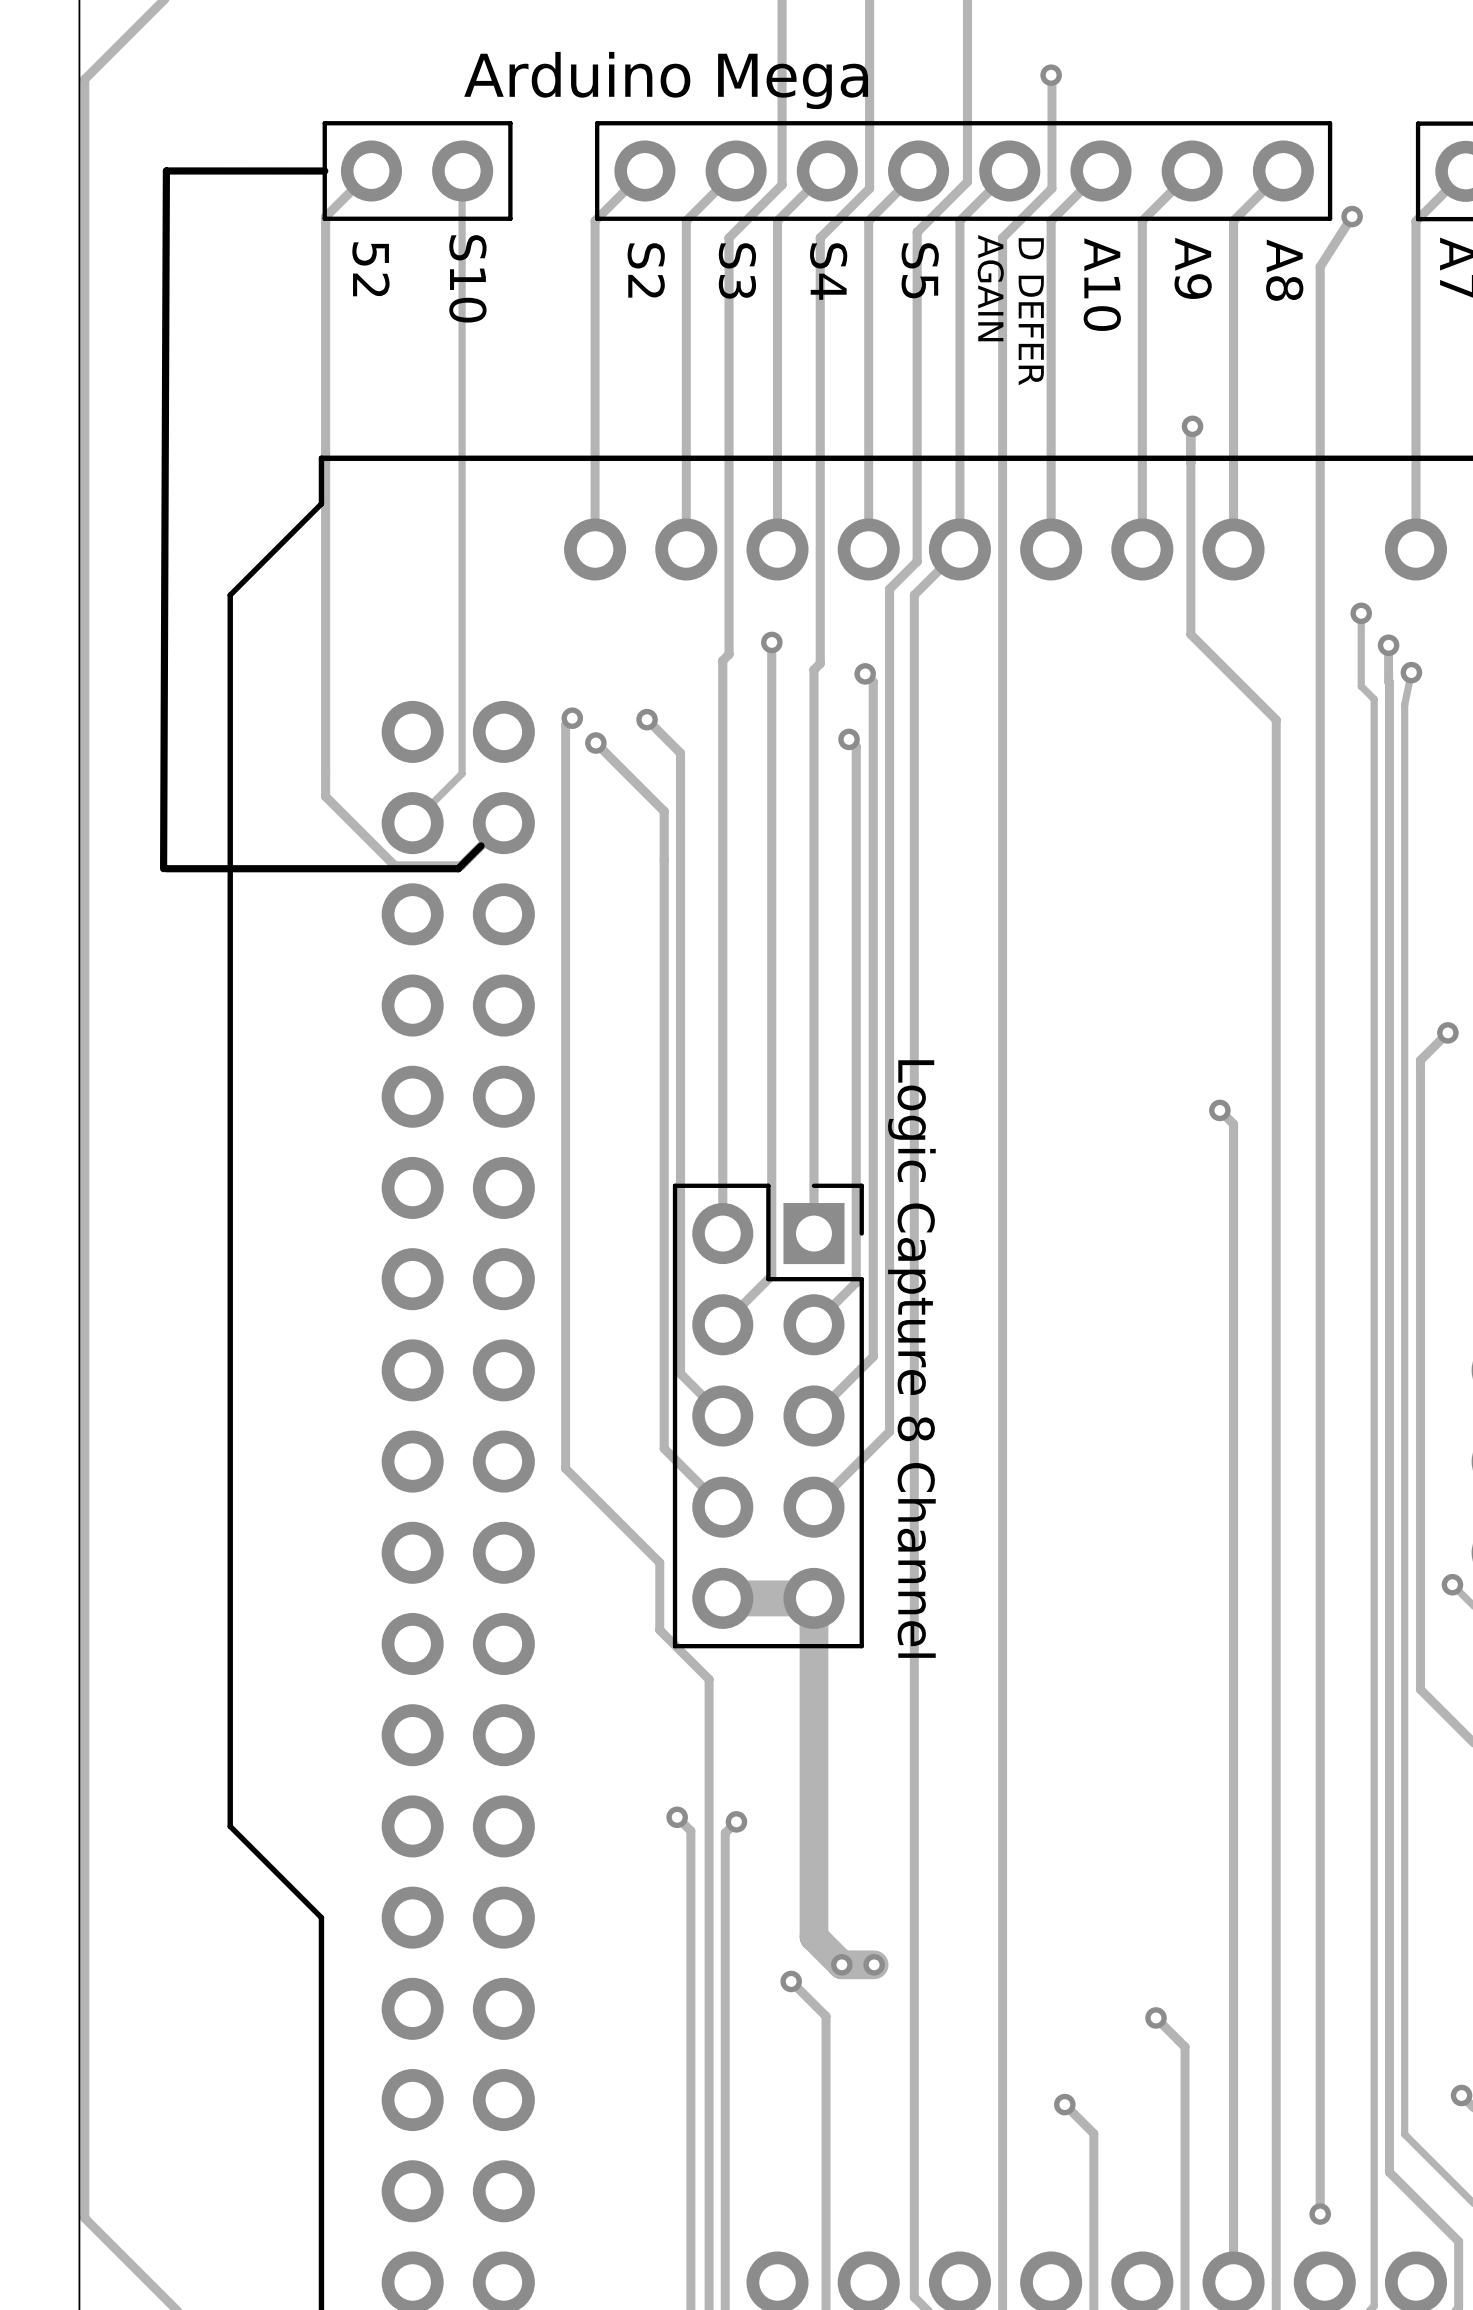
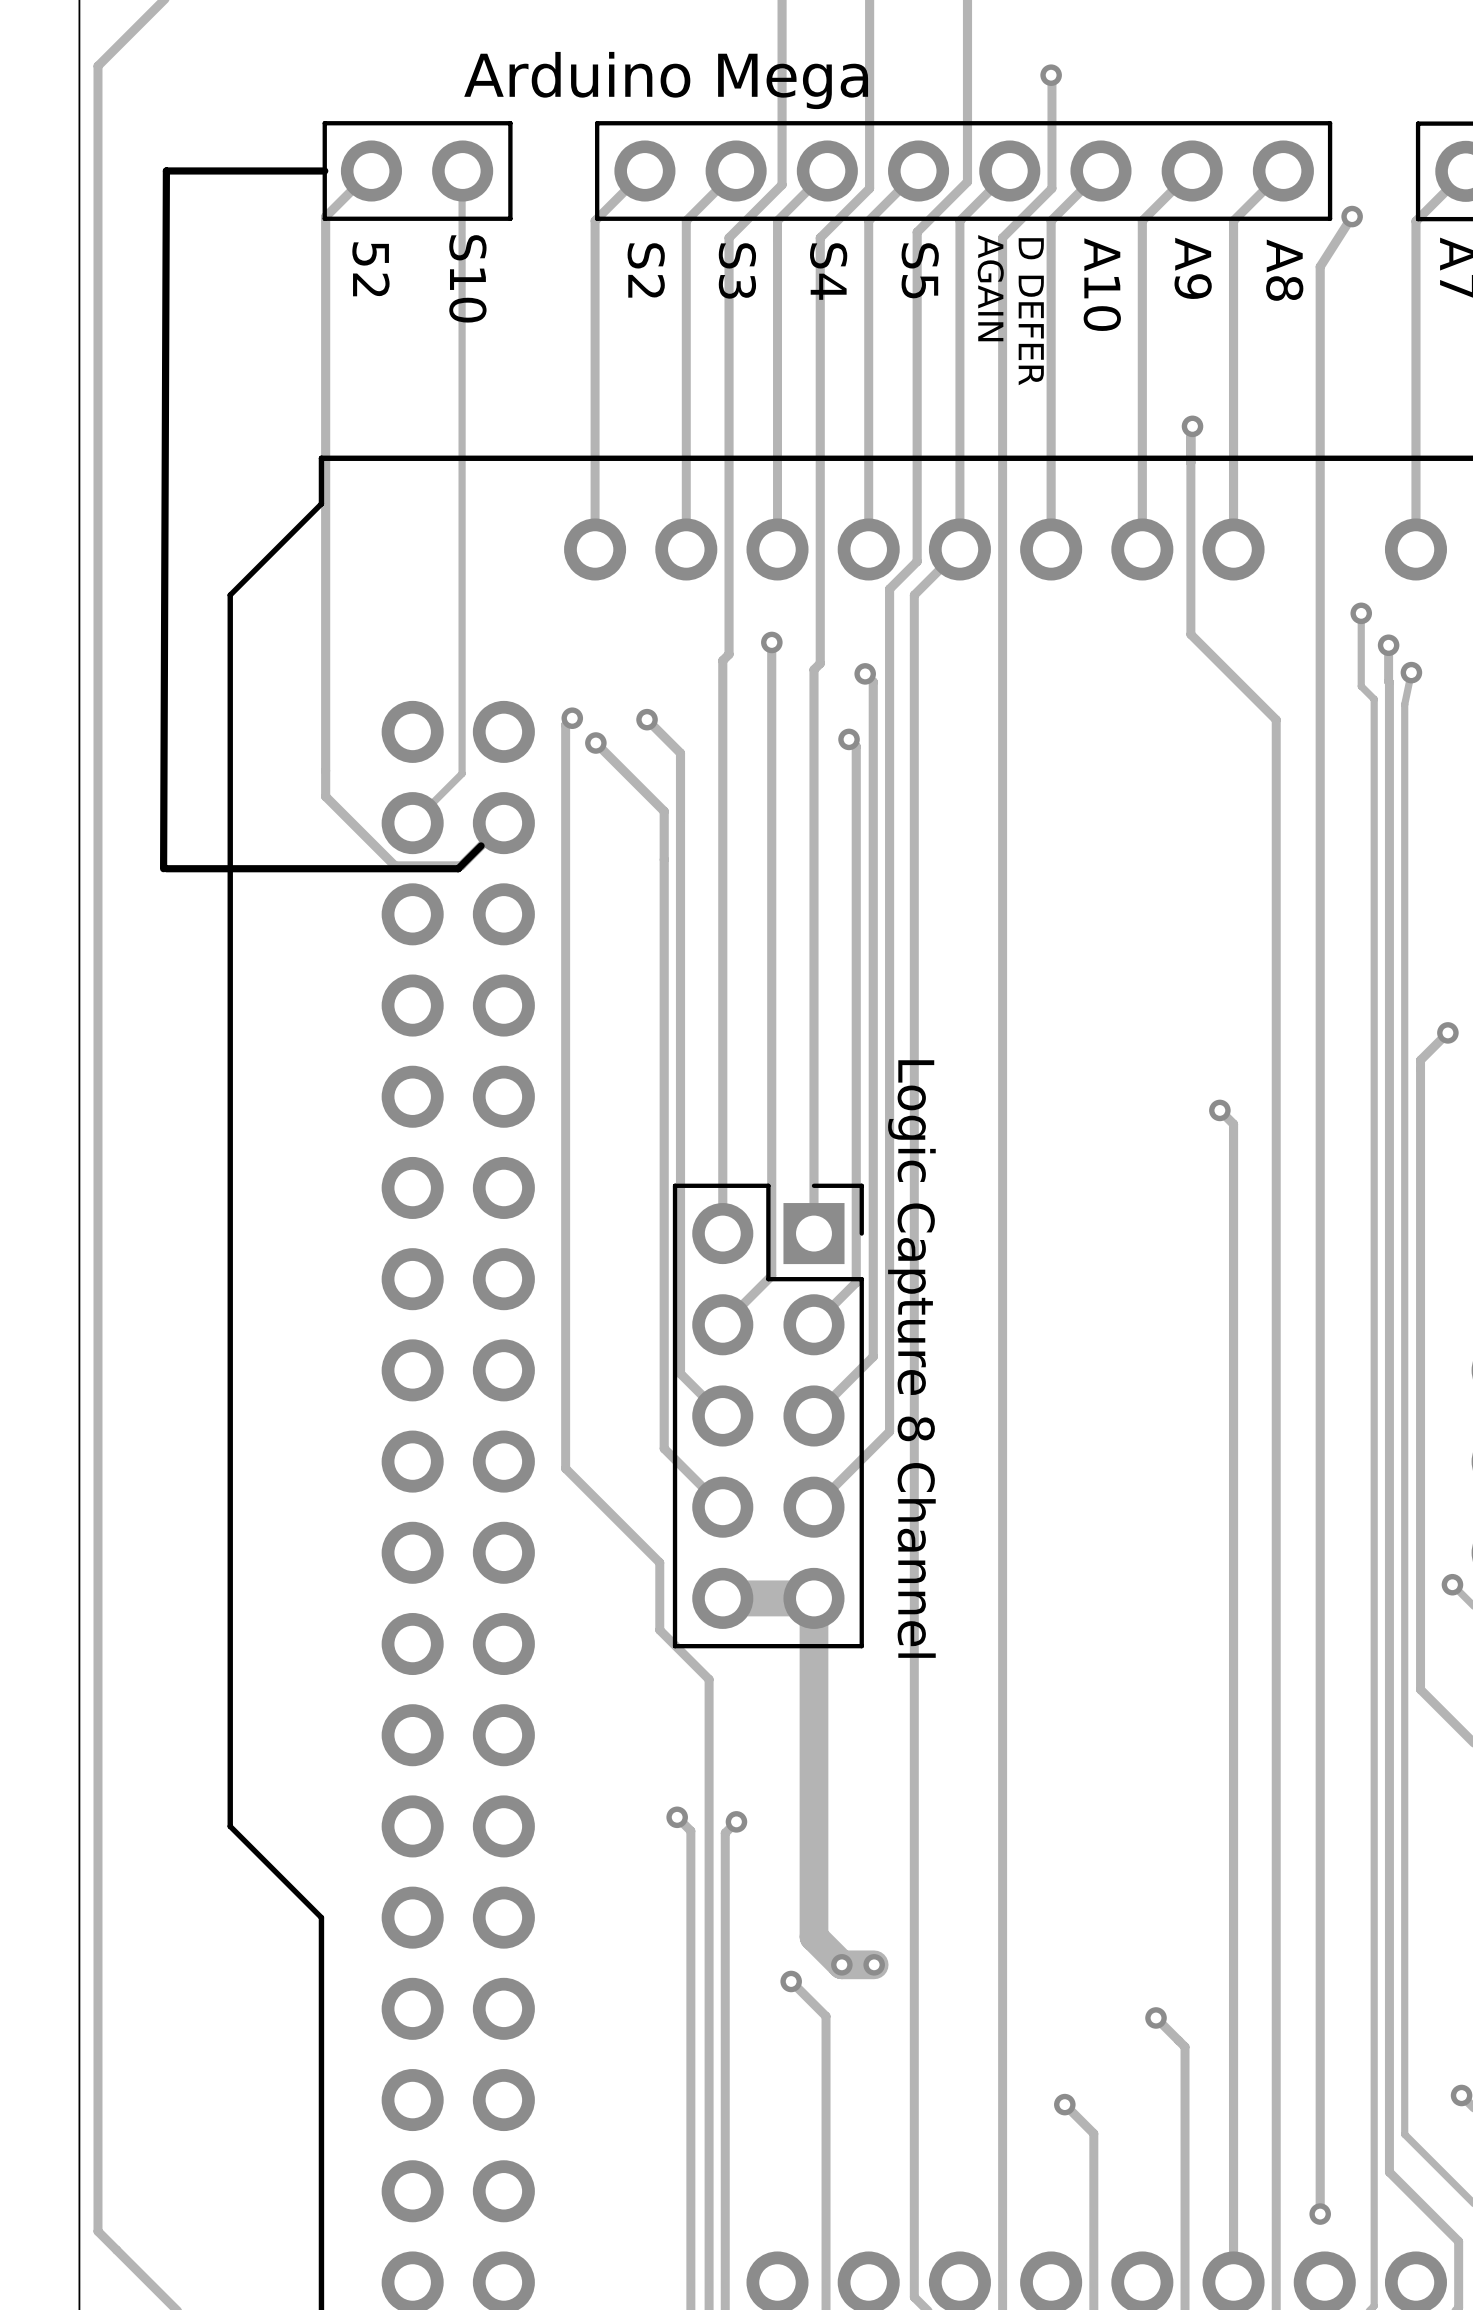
track: (97, 66) (84, 79) (84, 2218) (97, 2231) -> (97, 66) (97, 2231)

